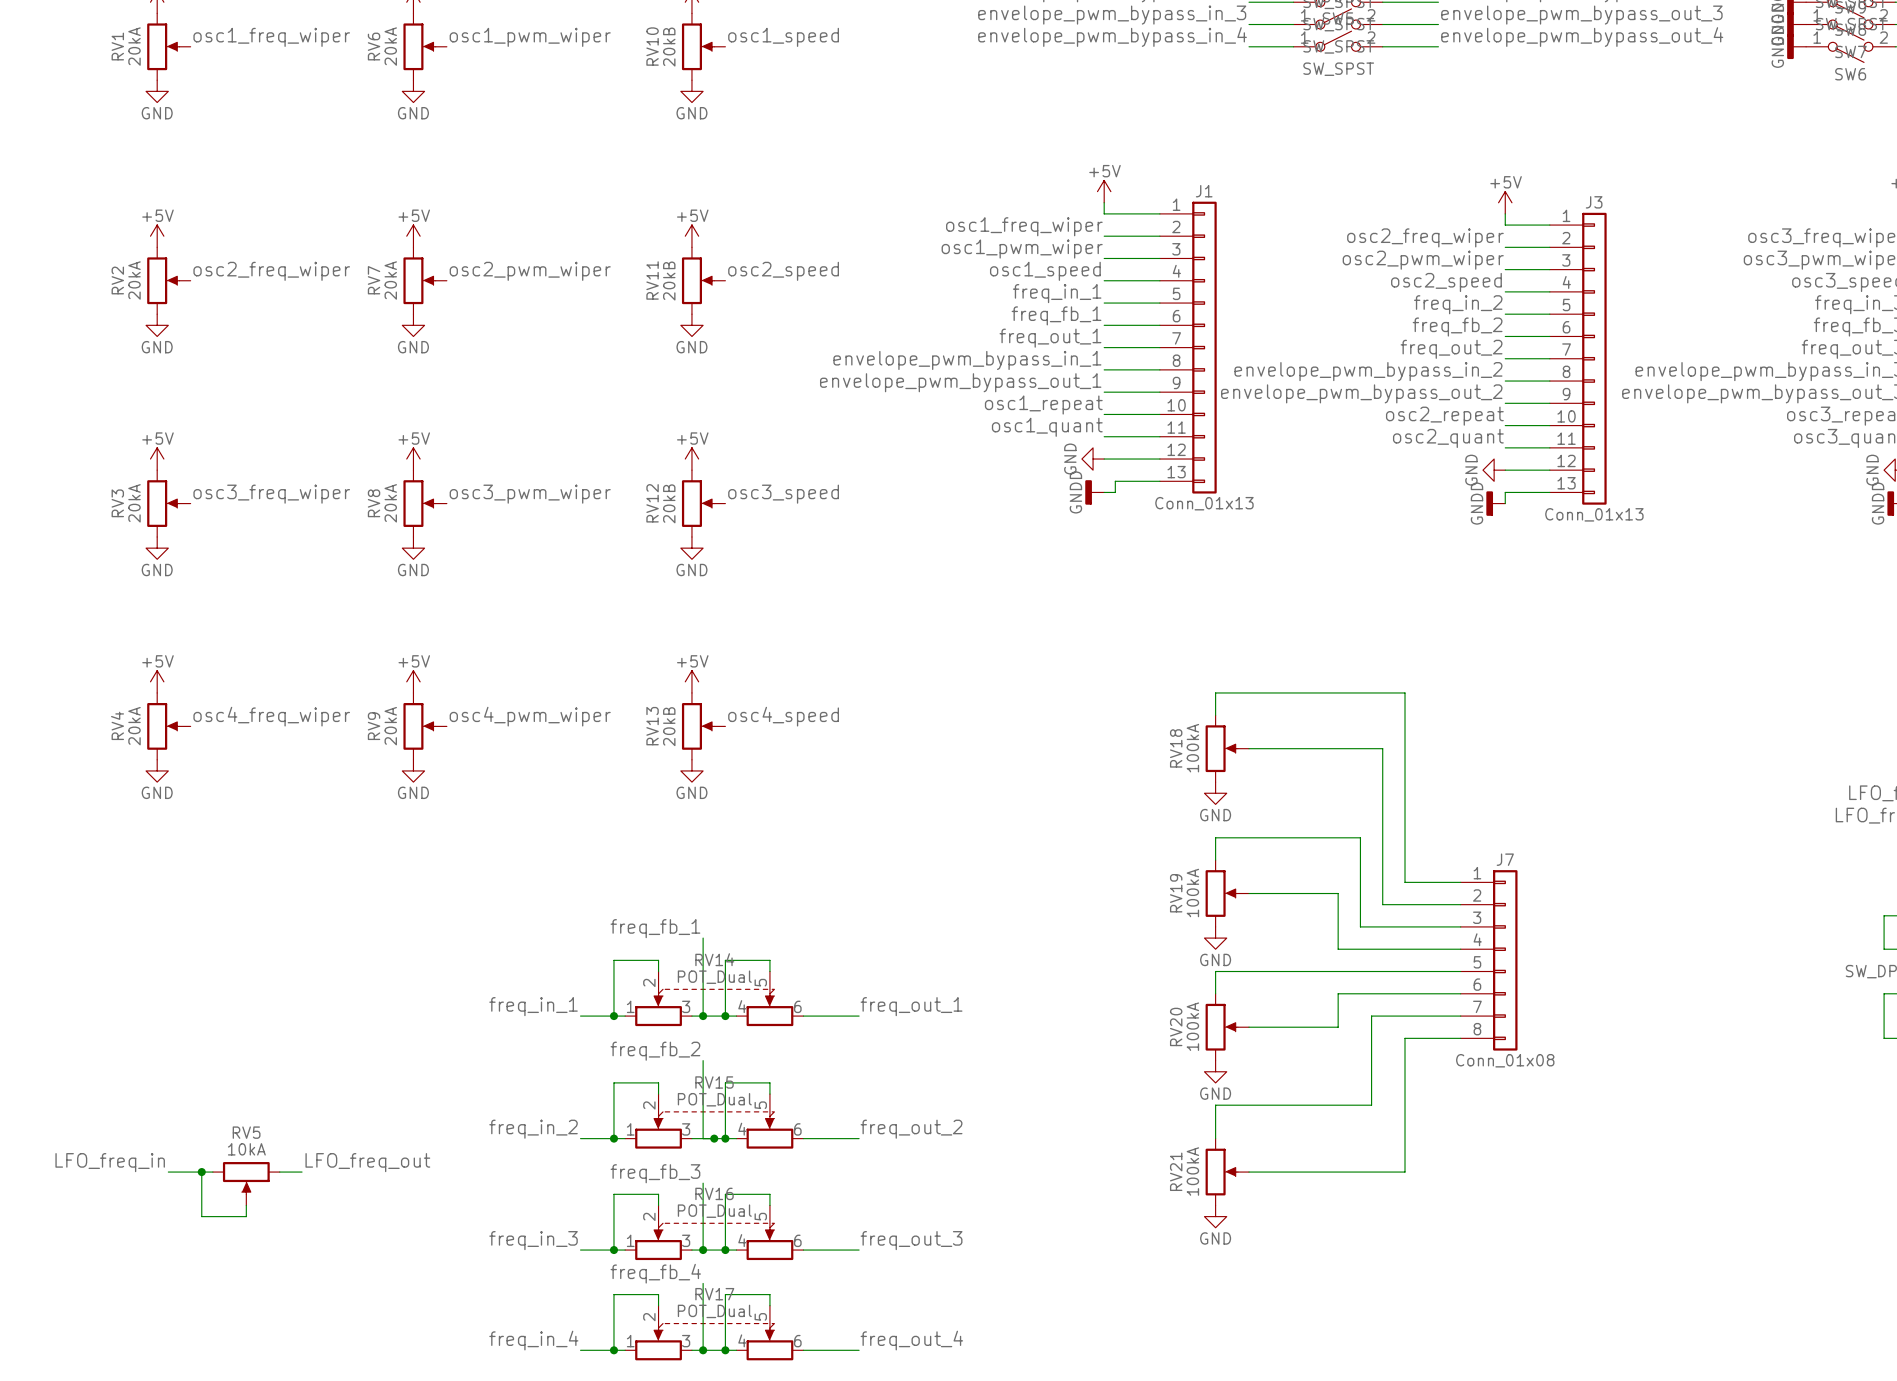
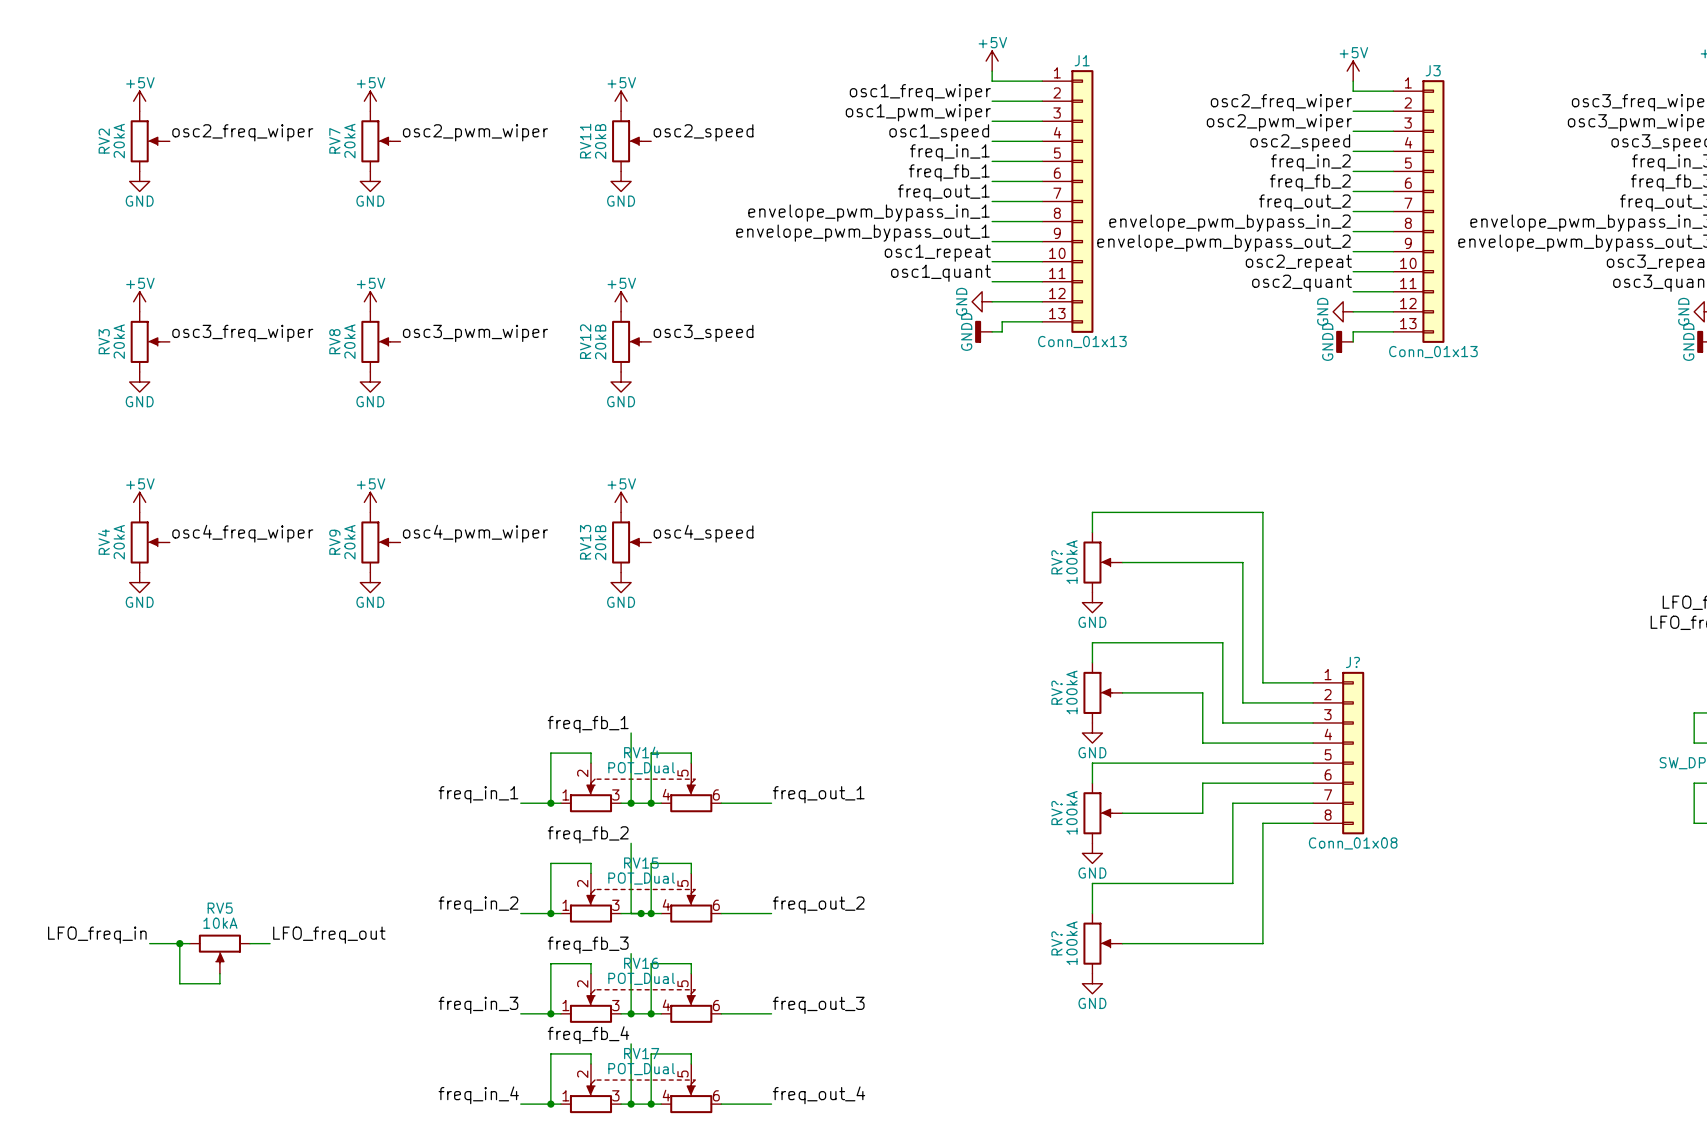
RV18 name: RV18 (1176, 748) -> RV? (1056, 562)
J7 name: J7 (1505, 859) -> J? (1352, 662)
RV19 name: RV19 (1176, 893) -> RV? (1056, 692)
RV20 name: RV20 (1176, 1026) -> RV? (1056, 813)
RV21 name: RV21 (1176, 1171) -> RV? (1056, 943)

